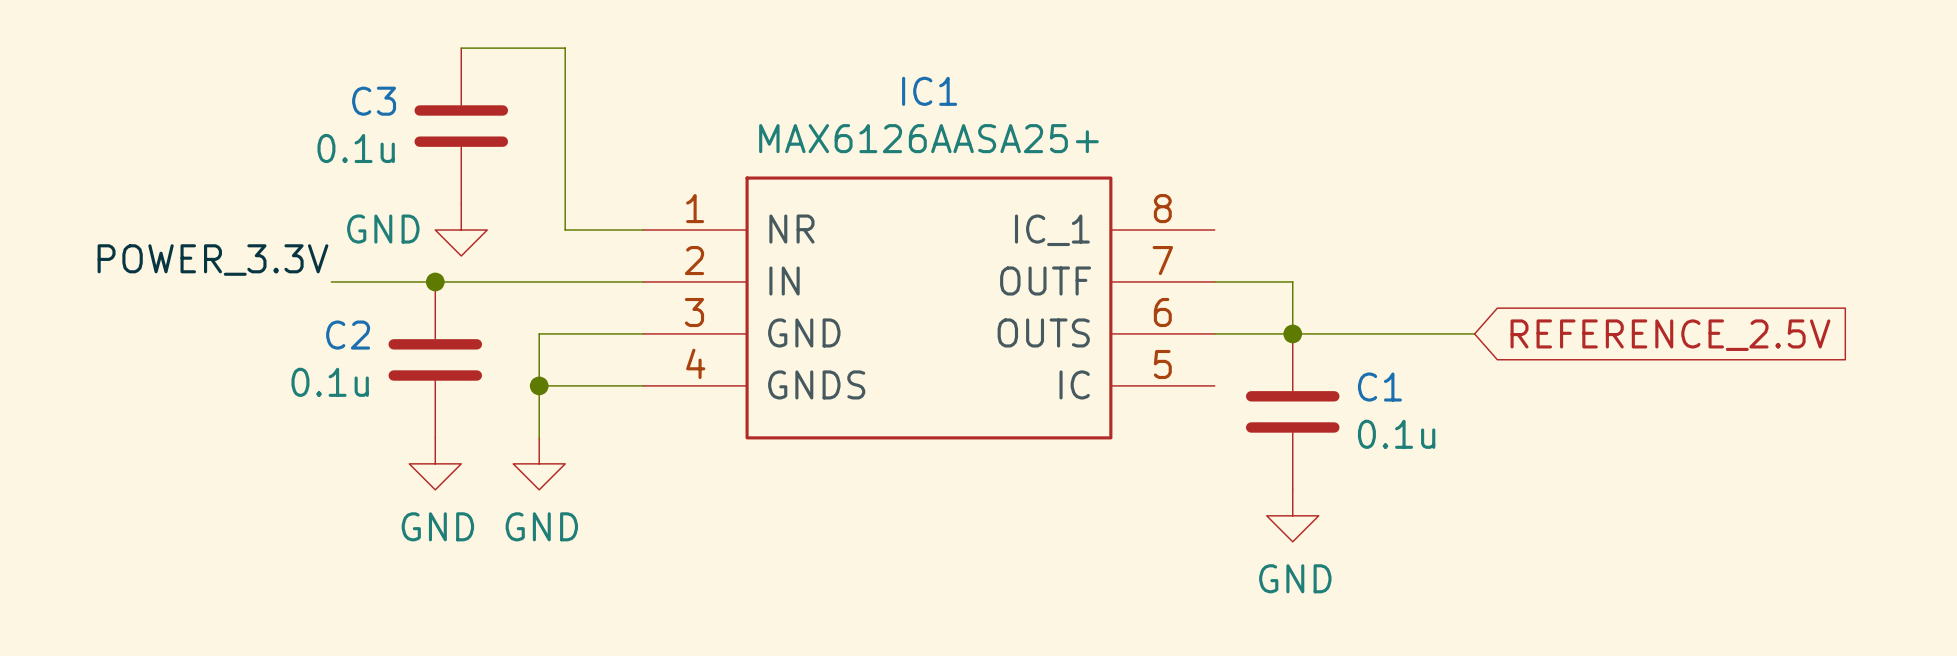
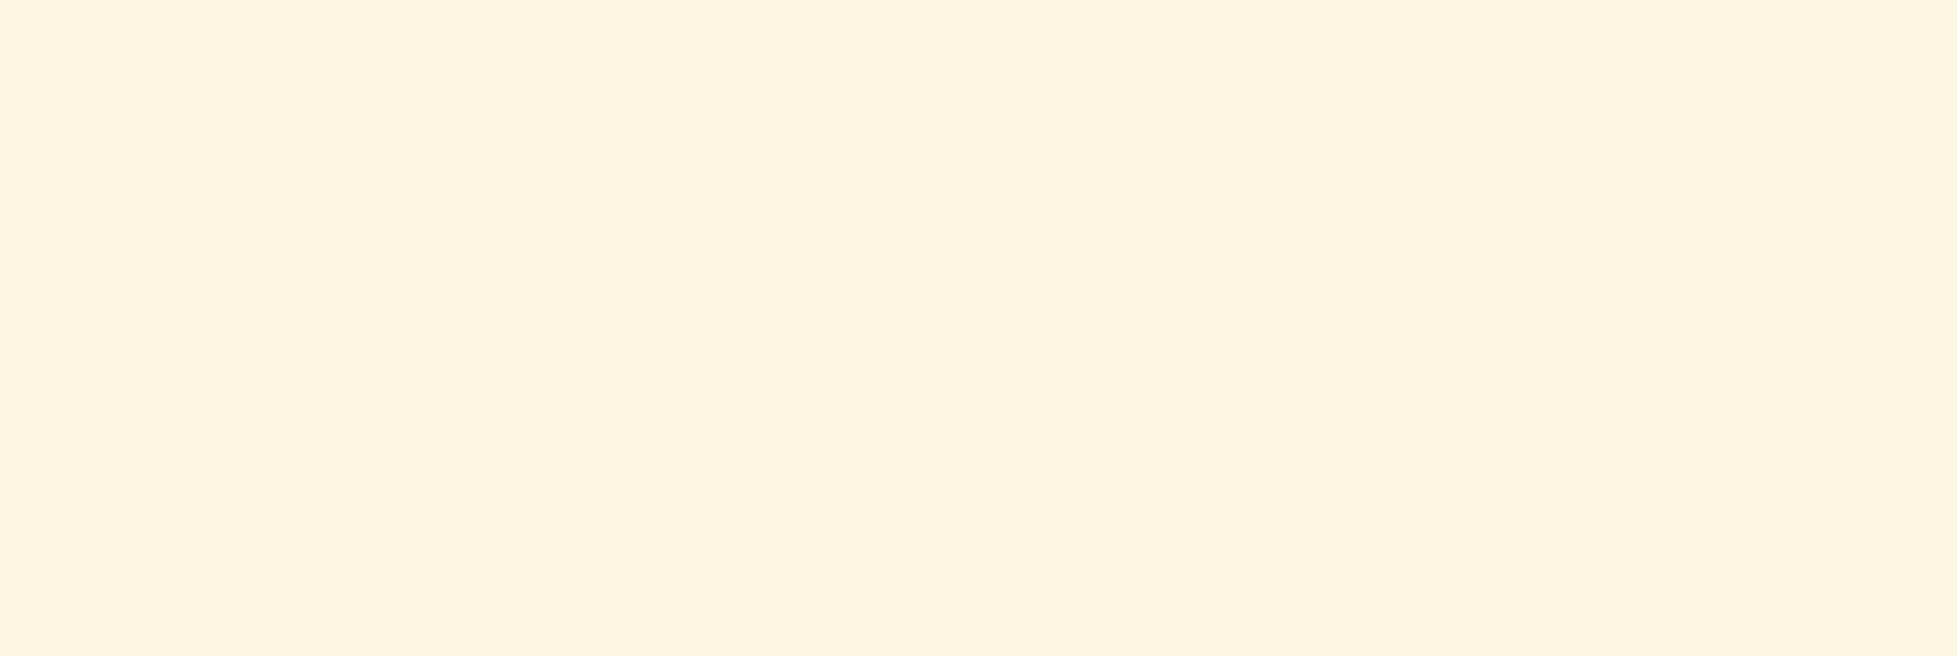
wire: (461, 48) (565, 48) (565, 230) (643, 230) -> none
C3: 0.1u (461, 126) -> none
power symbol: GND (461, 230) -> none
label: POWER_3.3V (212, 260) -> none
wire: (331, 281) (643, 281) -> none
junction: (435, 281) -> none
wire: (1214, 281) (1292, 281) (1292, 333) -> none
IC1: MAX6126AASA25+ (928, 307) -> none
wire: (643, 333) (539, 333) (539, 437) -> none
wire: (1214, 333) (1474, 333) -> none
junction: (1292, 333) -> none
global label: REFERENCE_2.5V (1670, 335) -> none
C2: 0.1u (435, 359) -> none
wire: (539, 385) (643, 385) -> none
junction: (539, 385) -> none
C1: 0.1u (1292, 411) -> none
power symbol: GND (435, 463) -> none
power symbol: GND (539, 463) -> none
power symbol: GND (1292, 515) -> none

